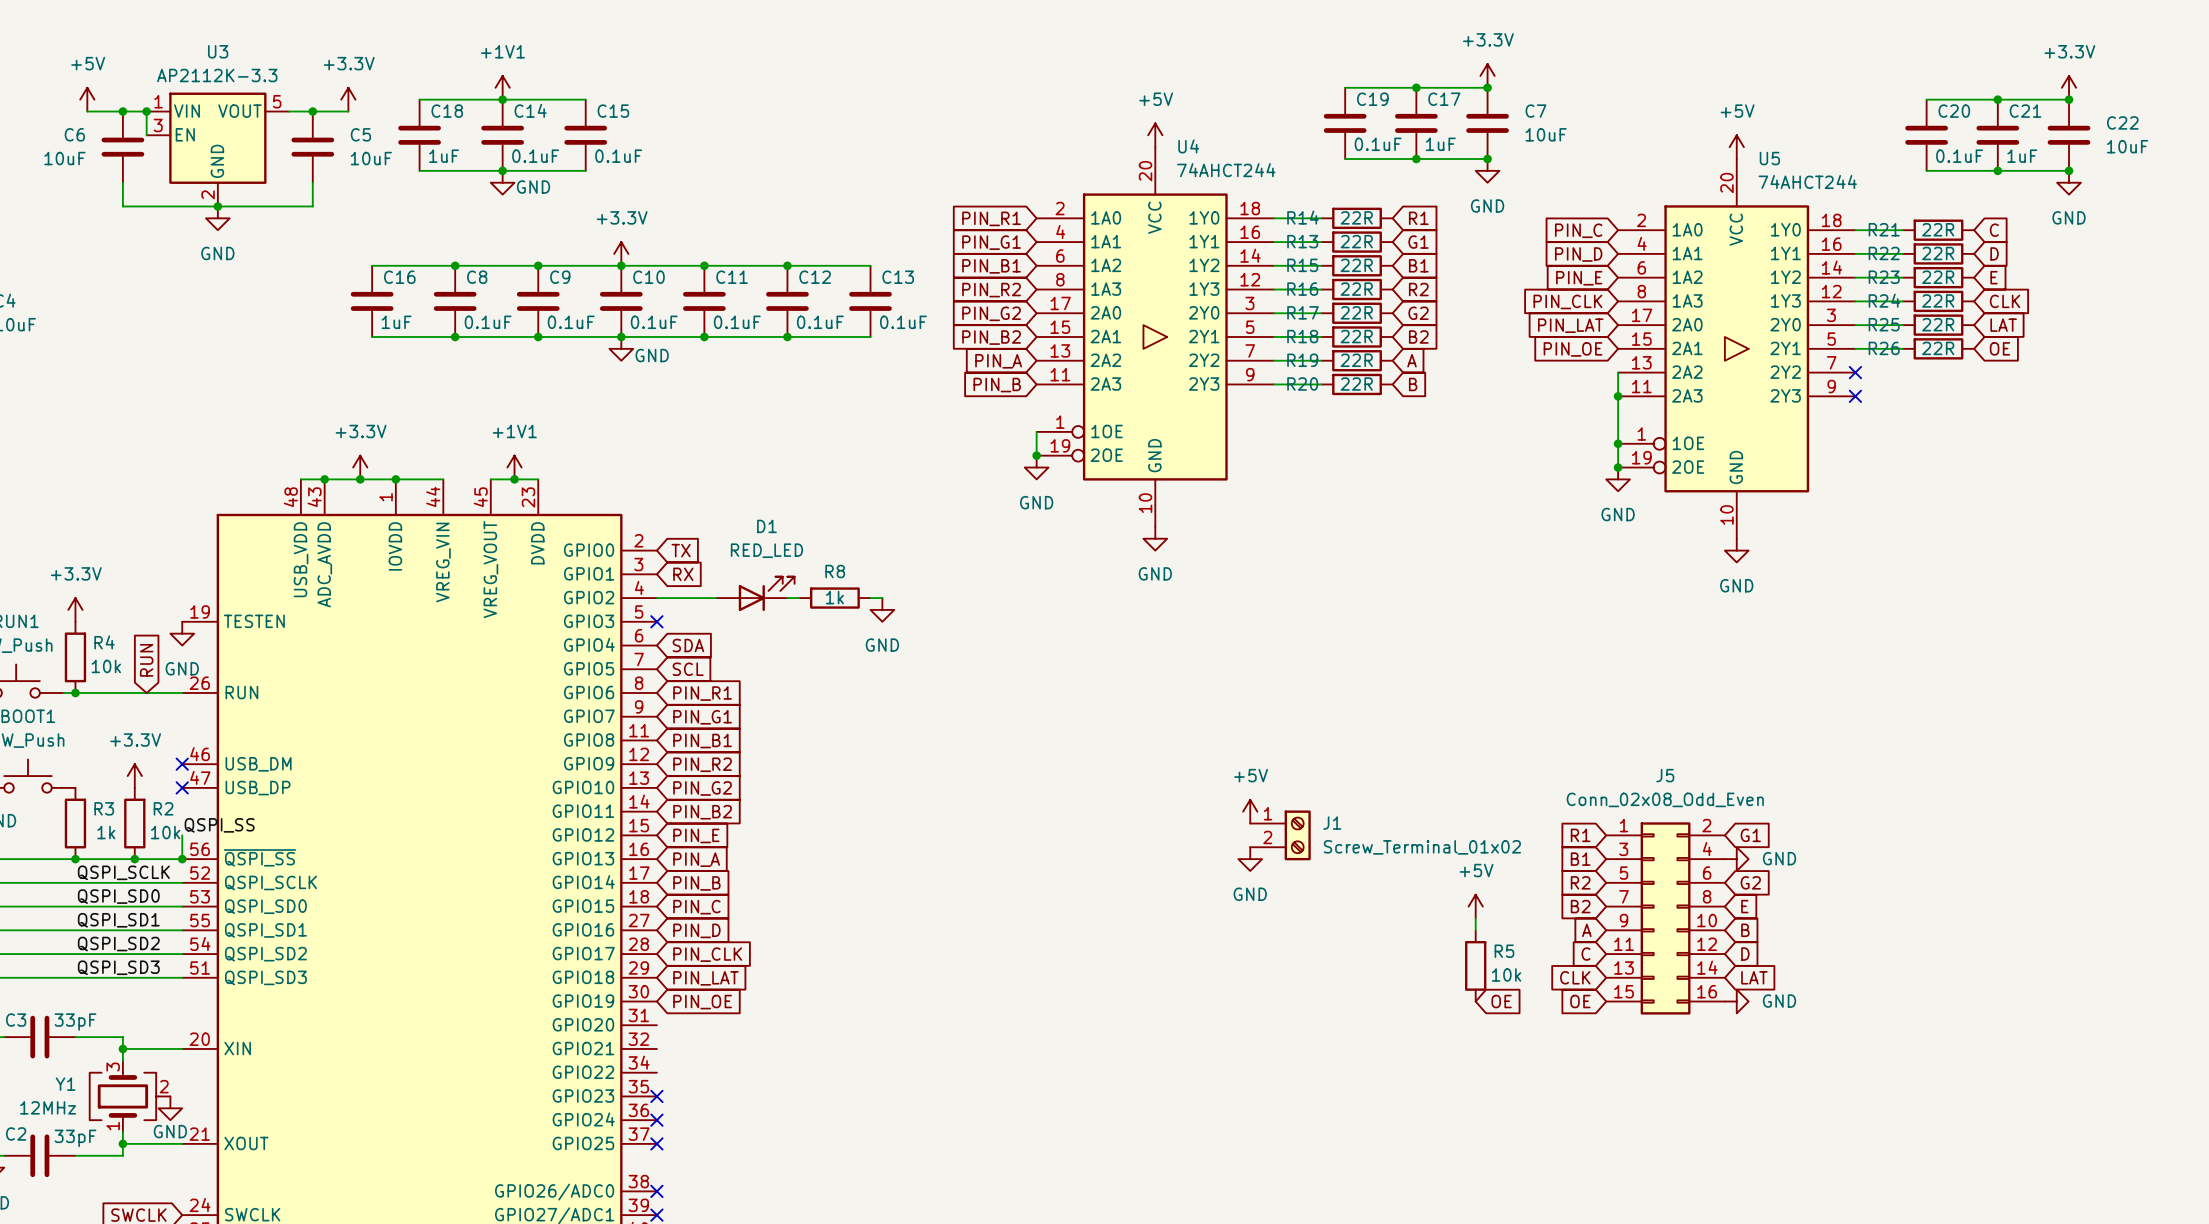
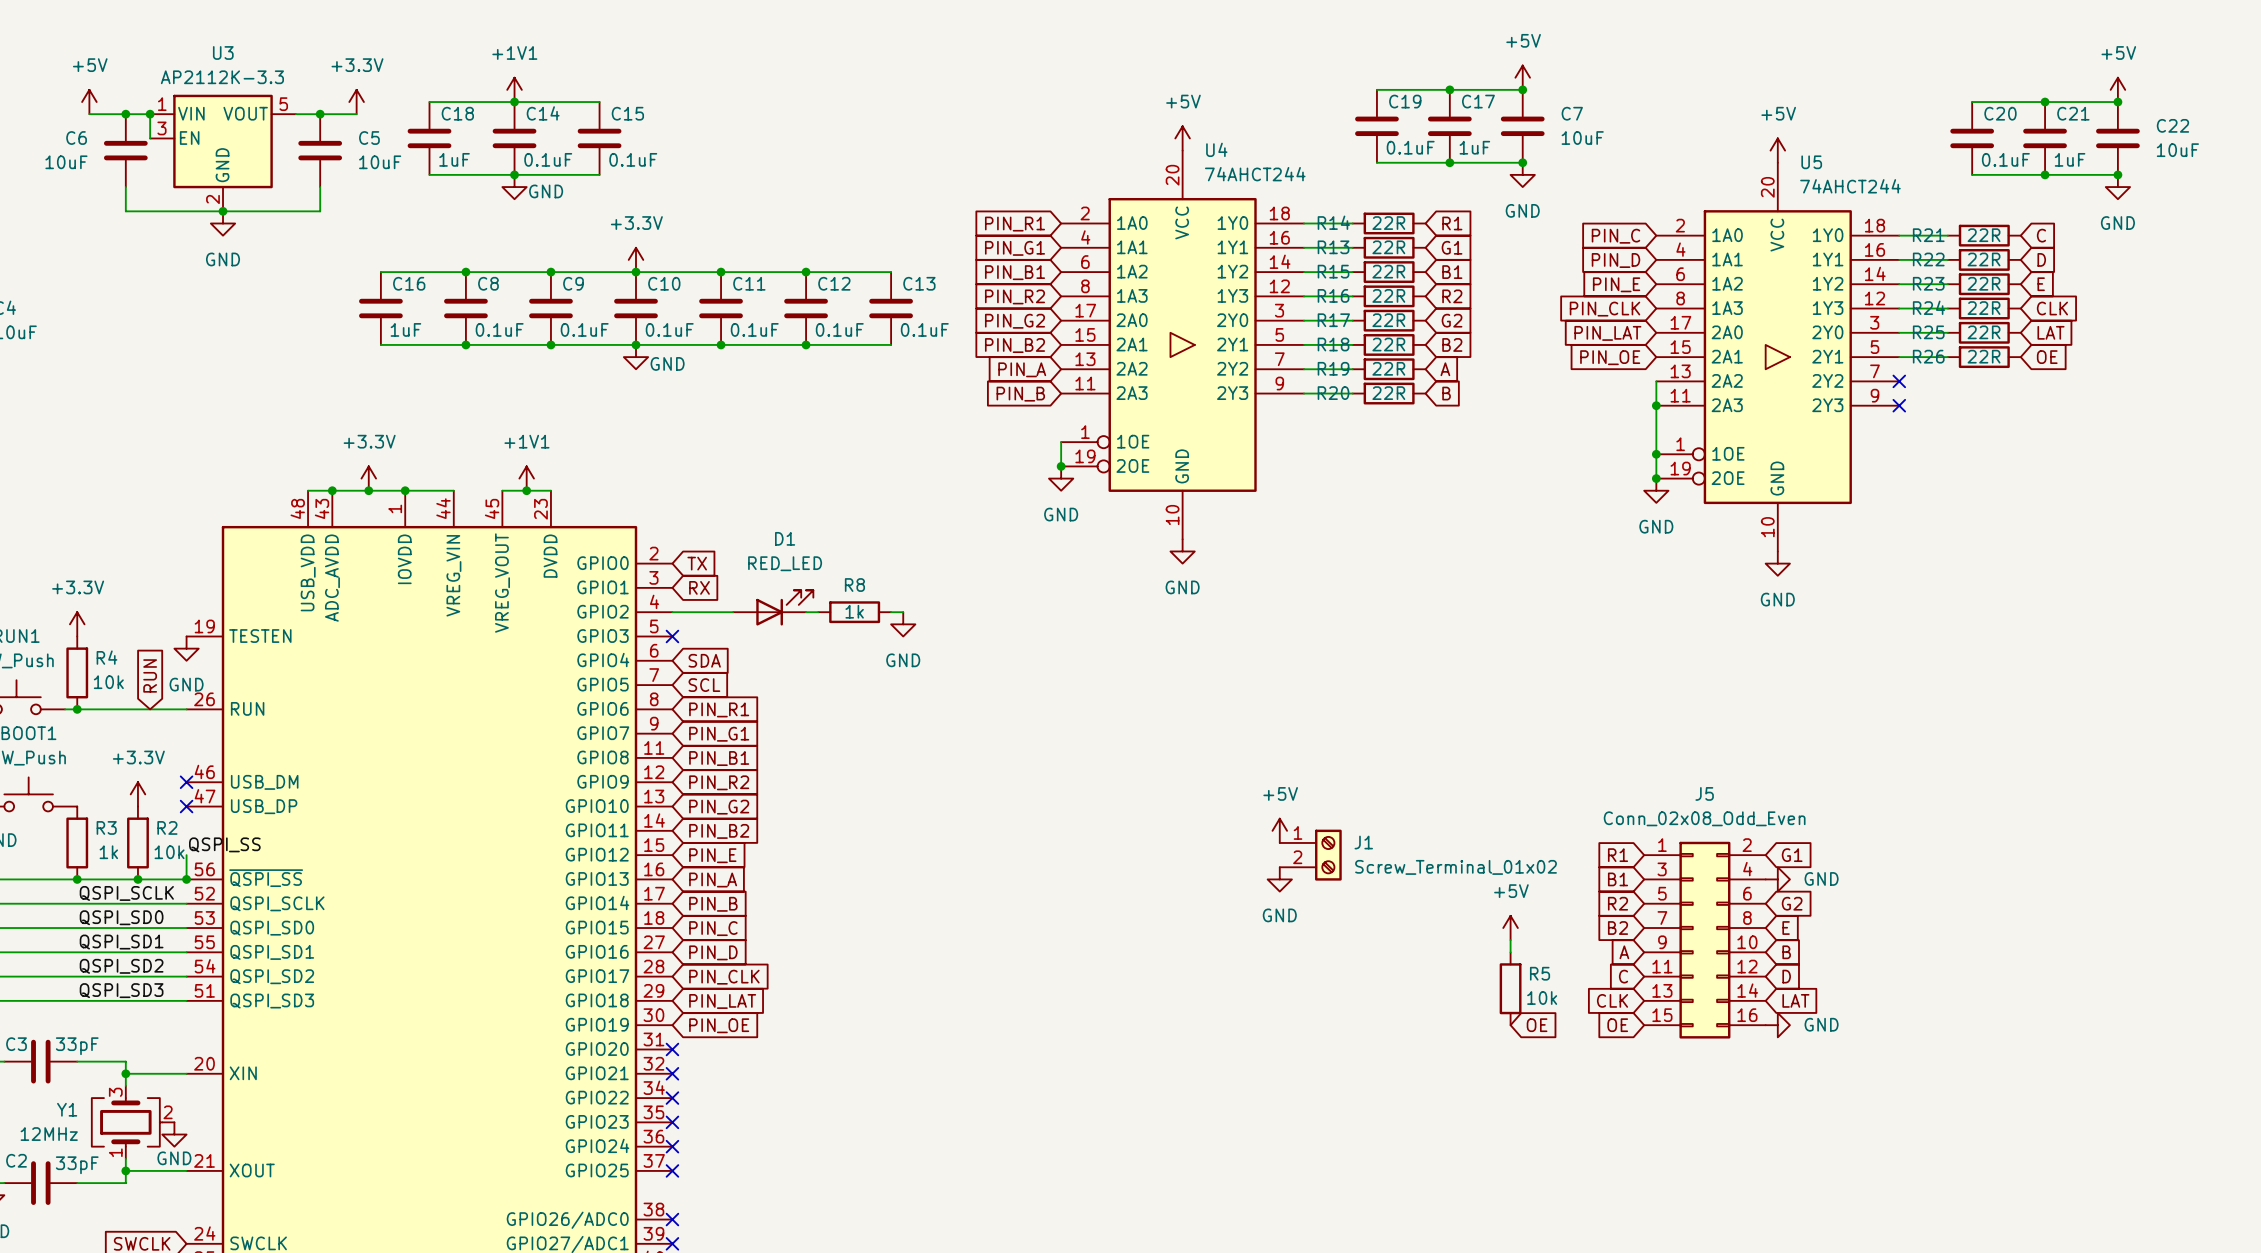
power symbol: +3.3V (1487, 75) -> +5V (1522, 77)
power symbol: +3.3V (2069, 87) -> +5V (2117, 89)
no-connect mark: none -> (672, 1049)
no-connect mark: none -> (672, 1073)
no-connect mark: none -> (672, 1098)

